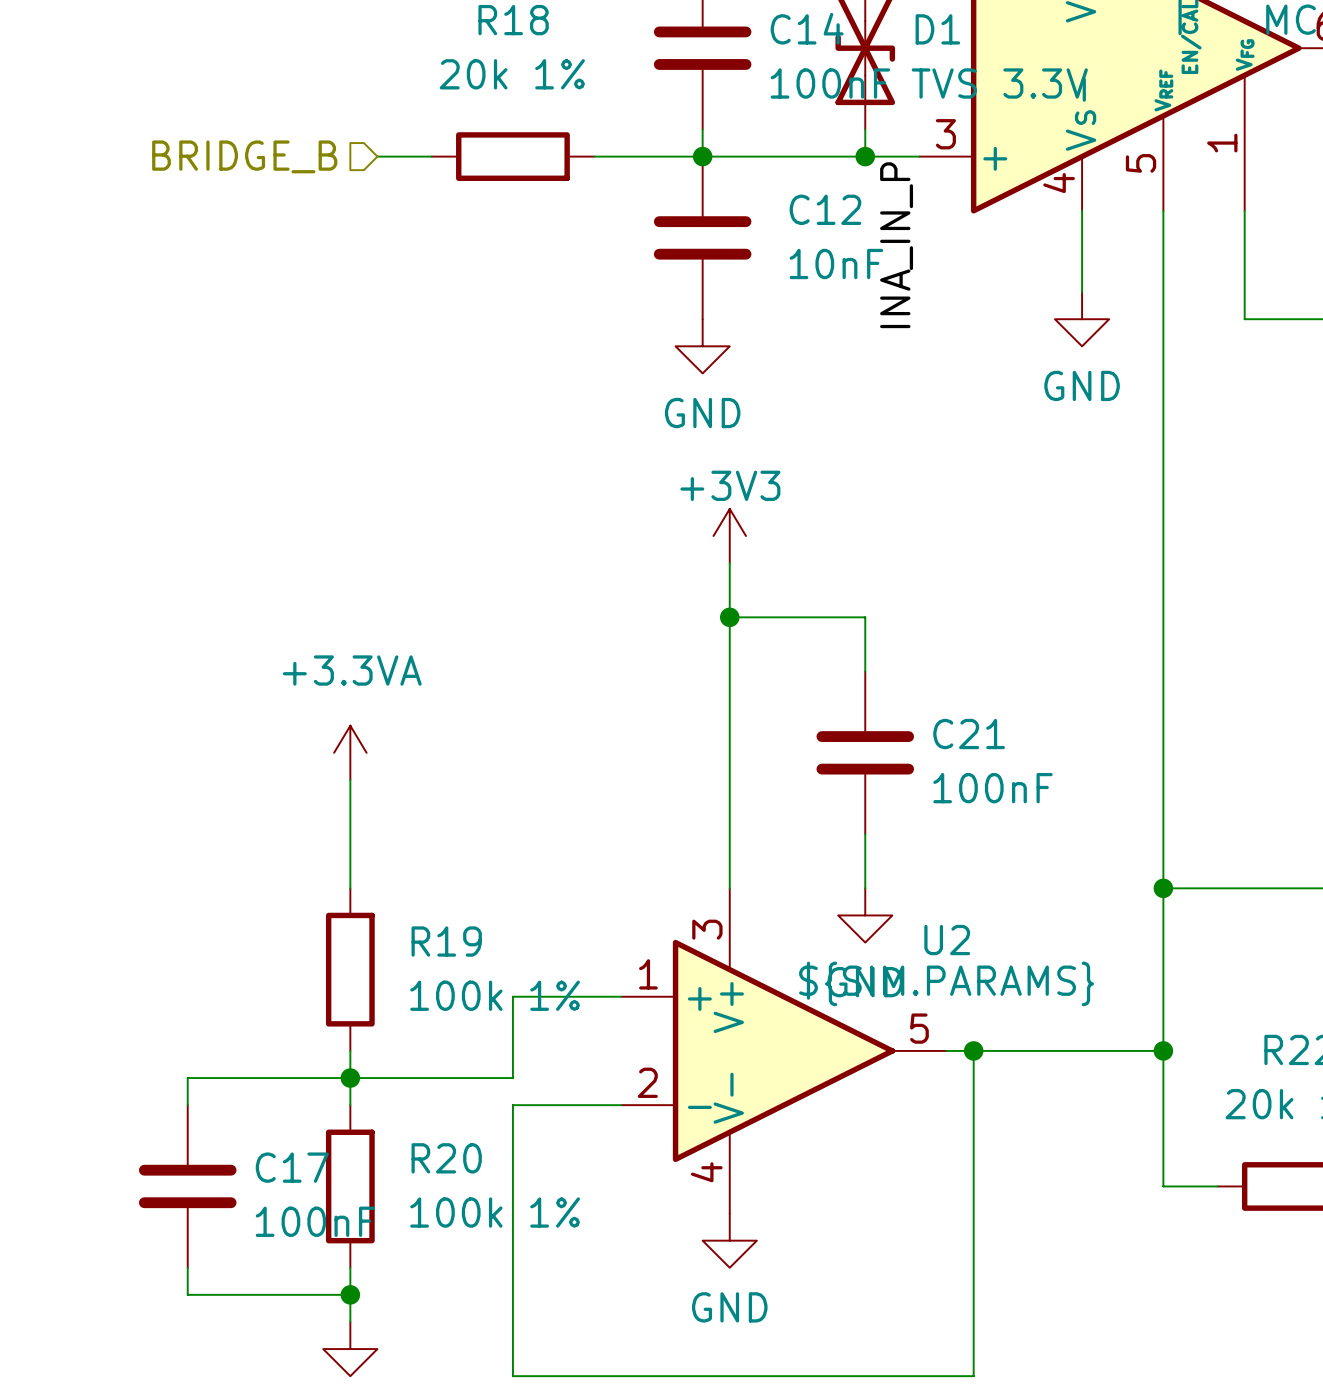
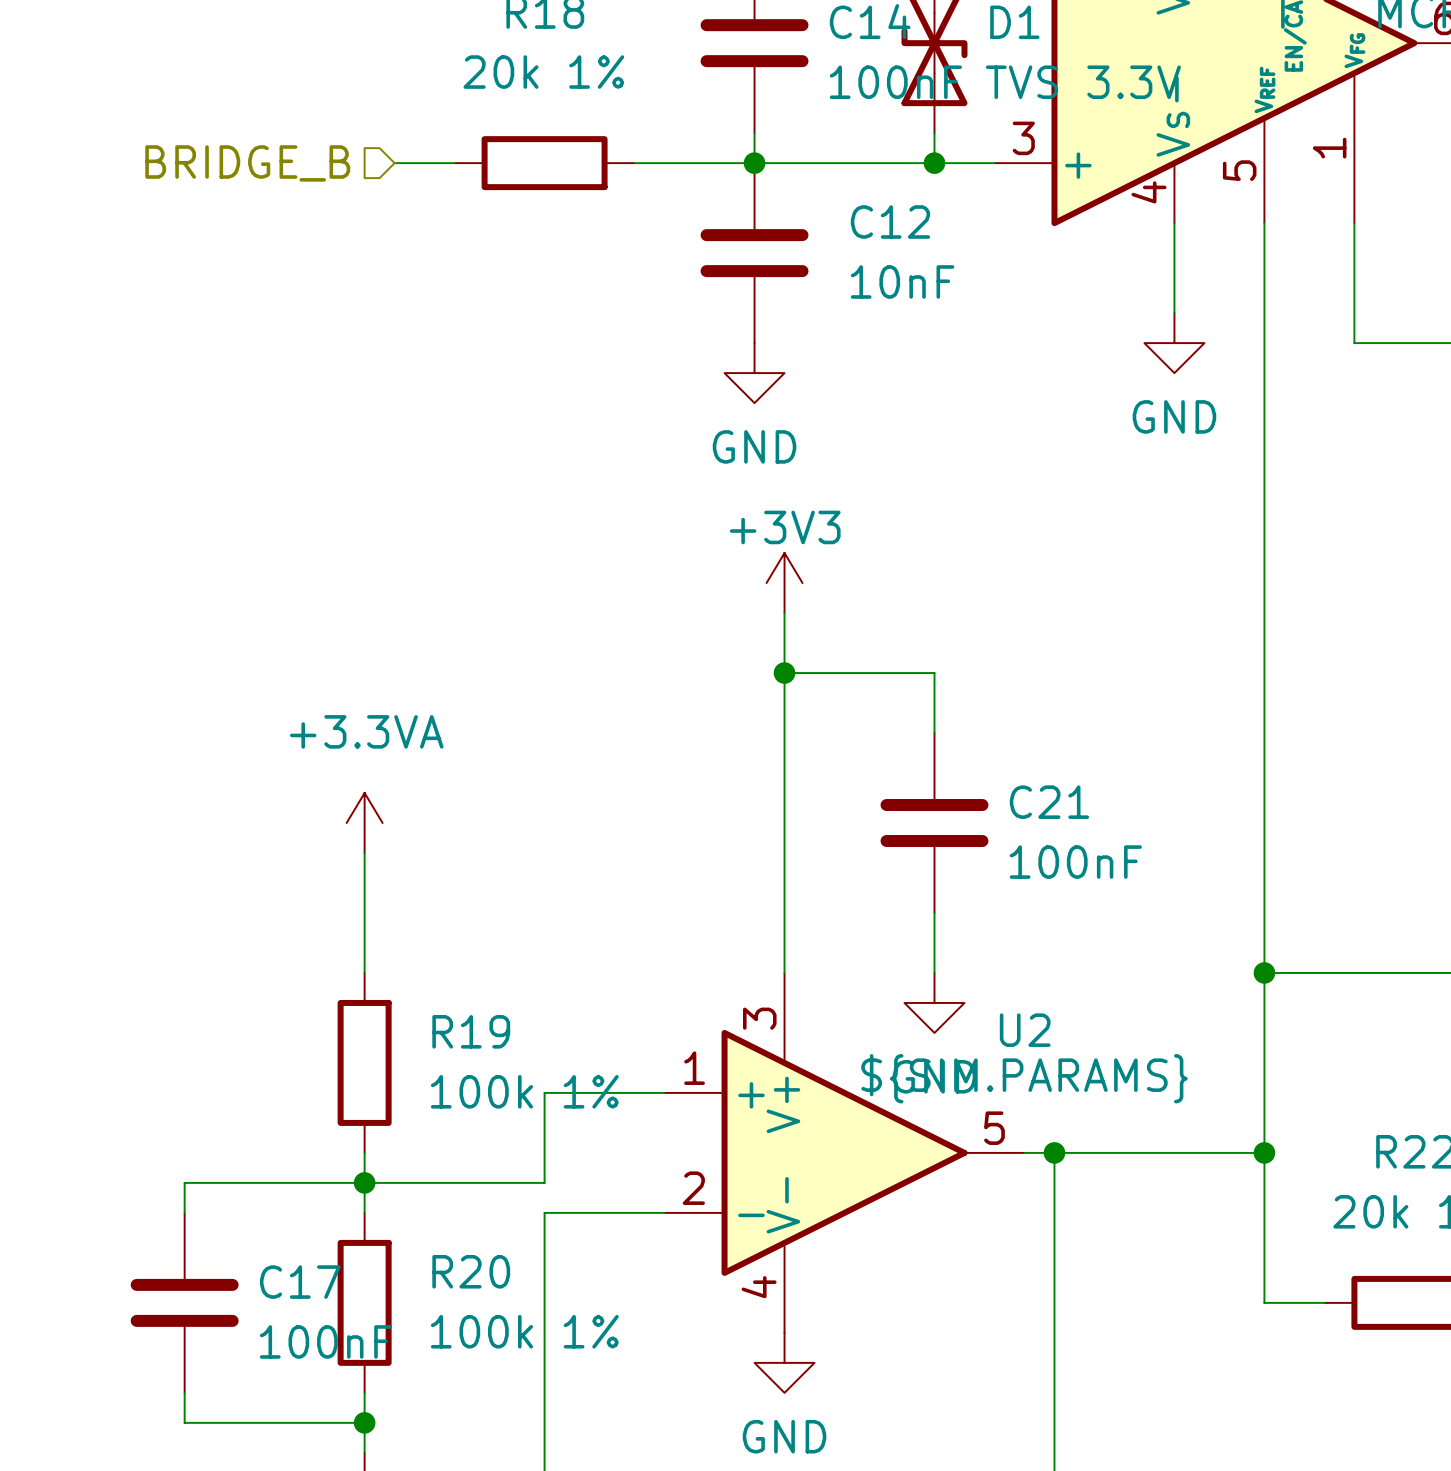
label: INA_IN_P (896, 245) -> none

